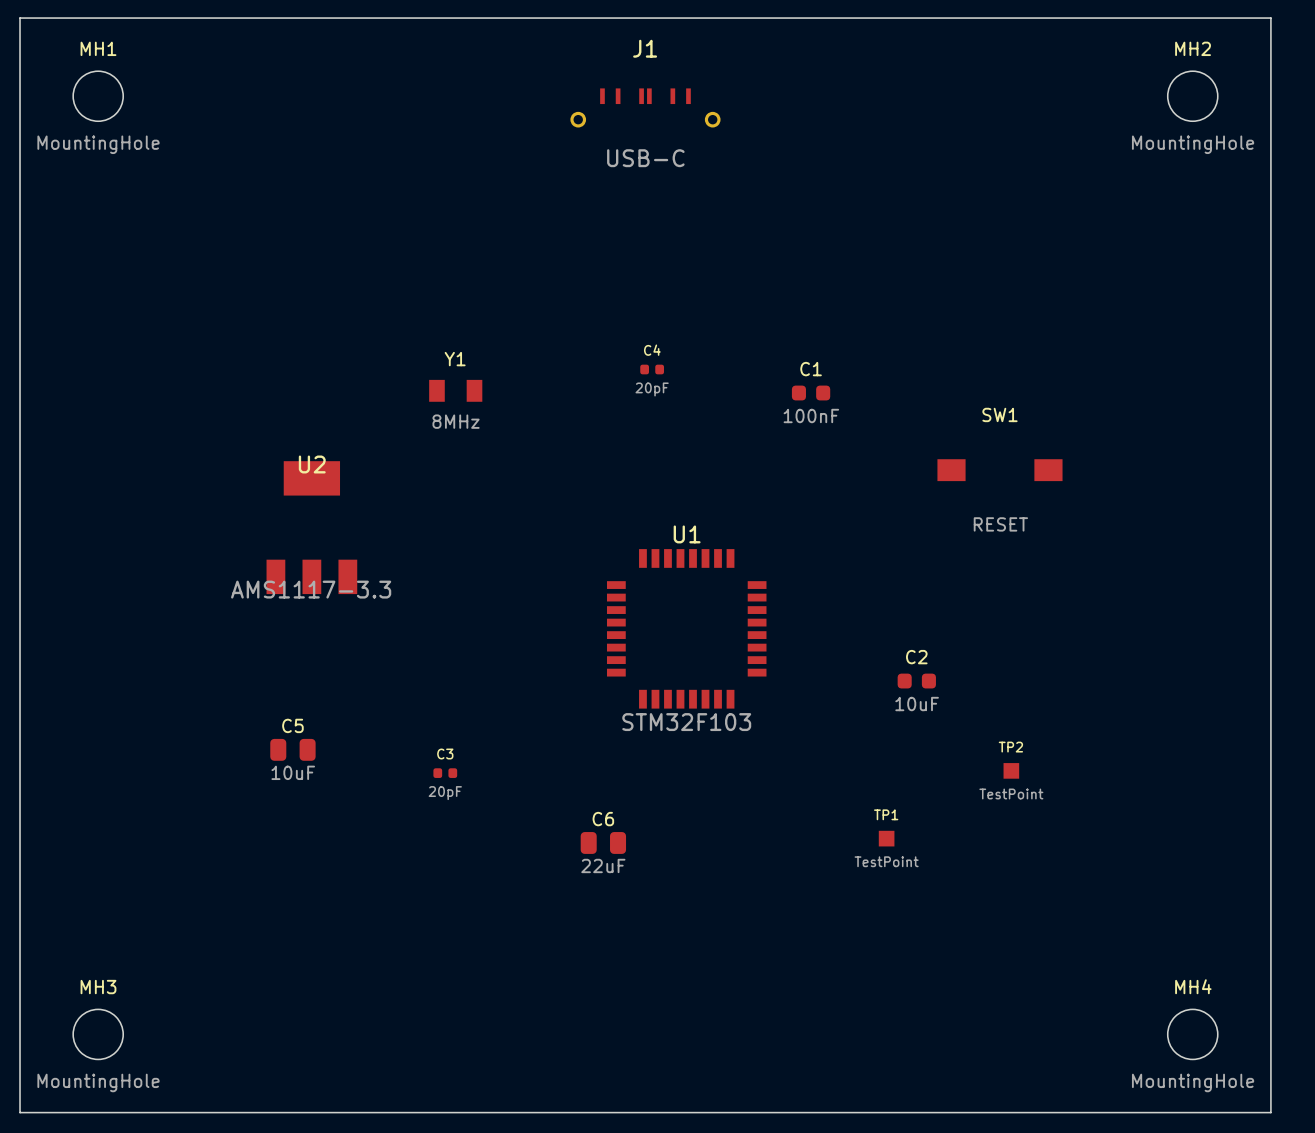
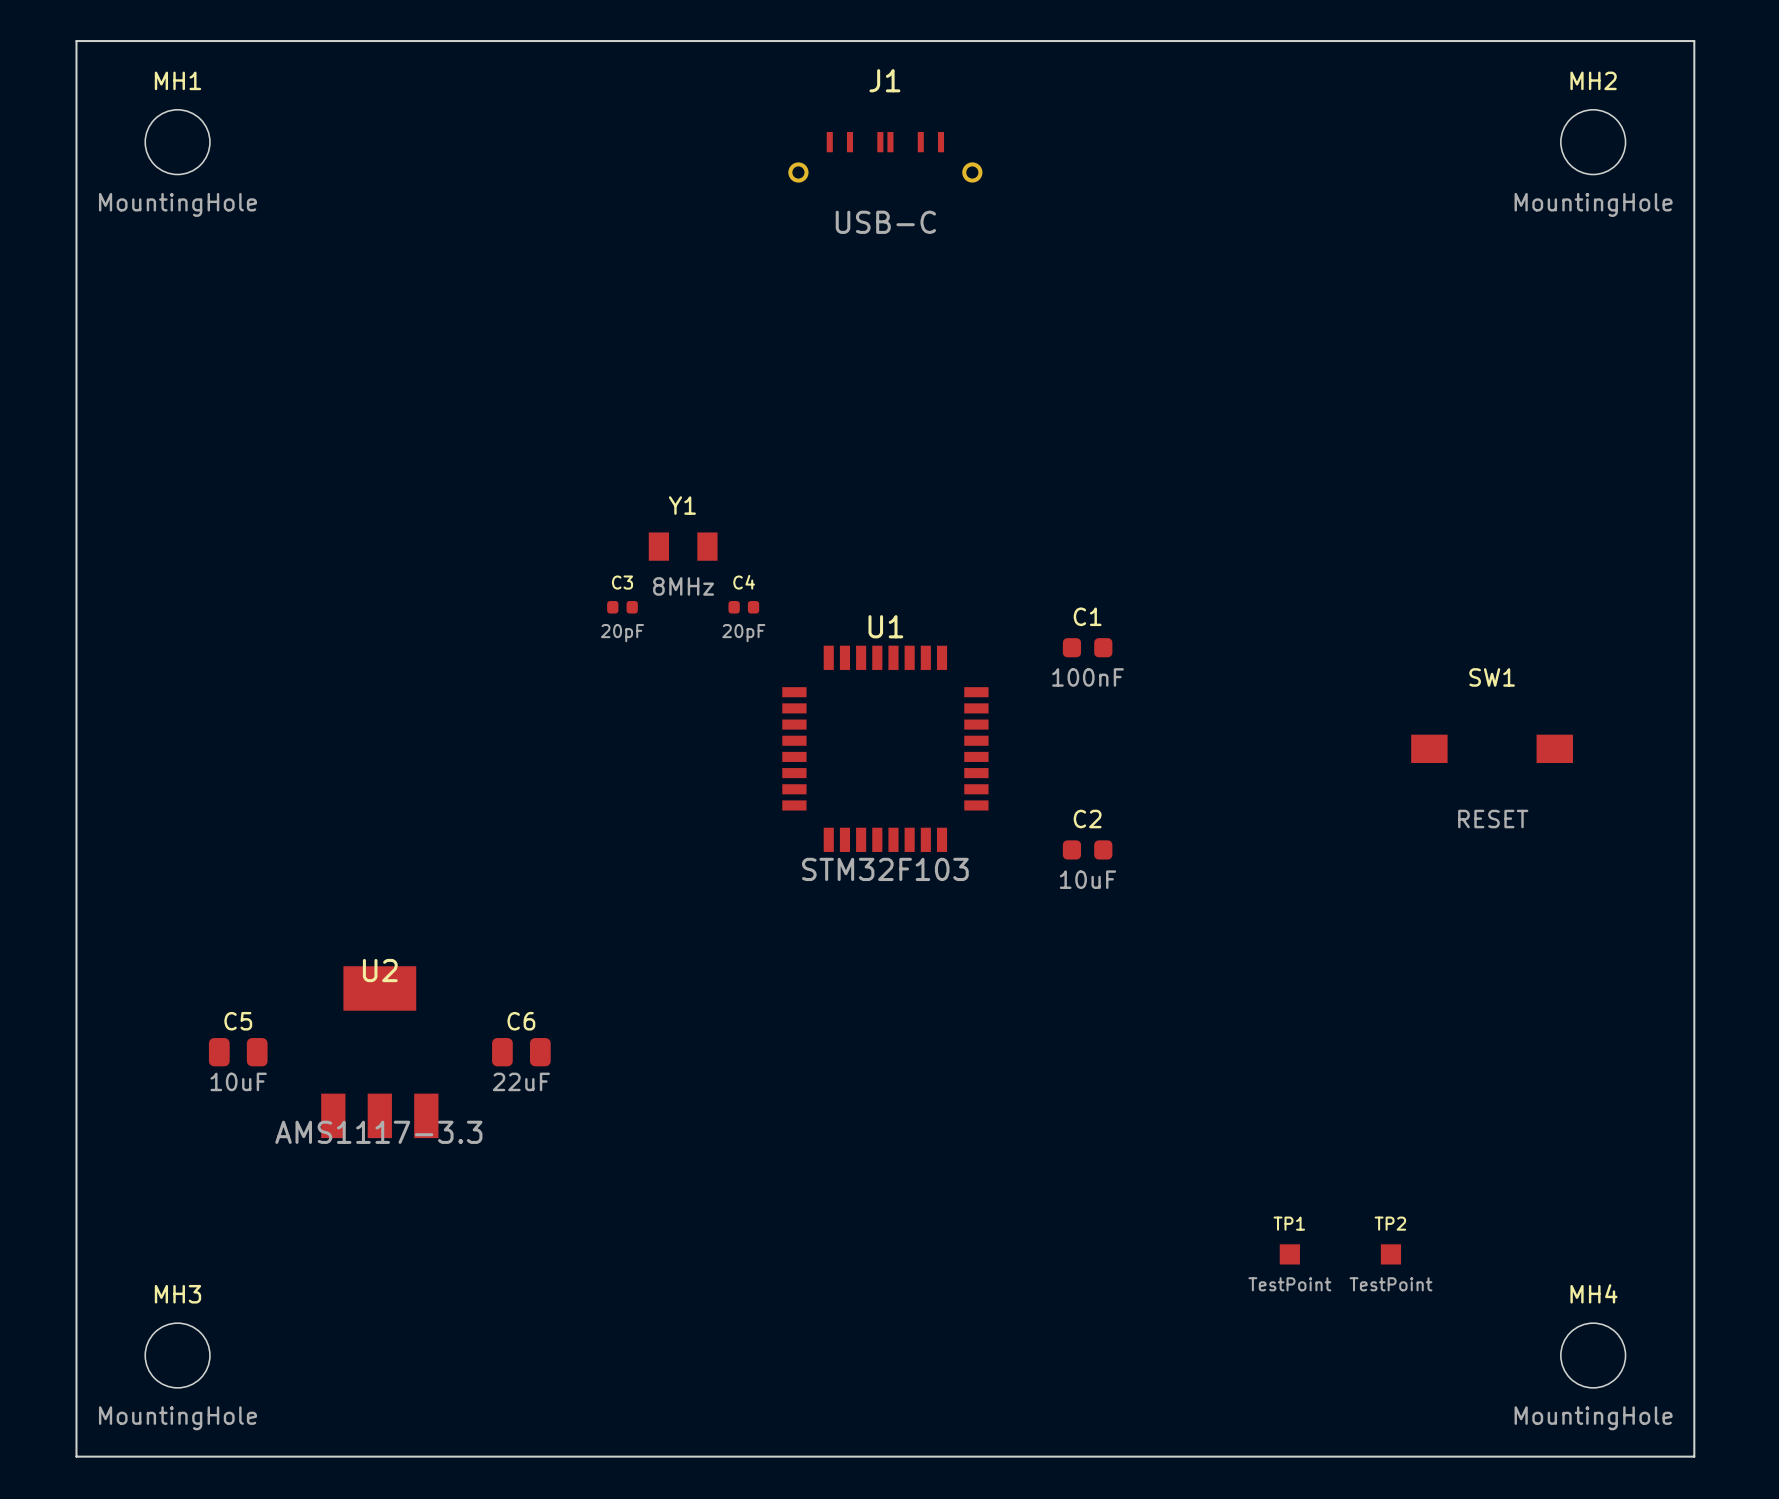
C4 position: (652, 369) -> (743, 607)
Y1 position: (455, 390) -> (683, 546)
C1 position: (811, 393) -> (1087, 647)
SW1 position: (999, 470) -> (1492, 748)
U2 position: (311, 527) -> (379, 1052)
U1 position: (686, 628) -> (885, 748)
C2 position: (916, 681) -> (1087, 849)
C5 position: (292, 749) -> (238, 1052)
TP2 position: (1011, 770) -> (1390, 1254)
C3 position: (445, 773) -> (622, 607)
TP1 position: (886, 838) -> (1289, 1254)
C6 position: (603, 842) -> (521, 1052)

